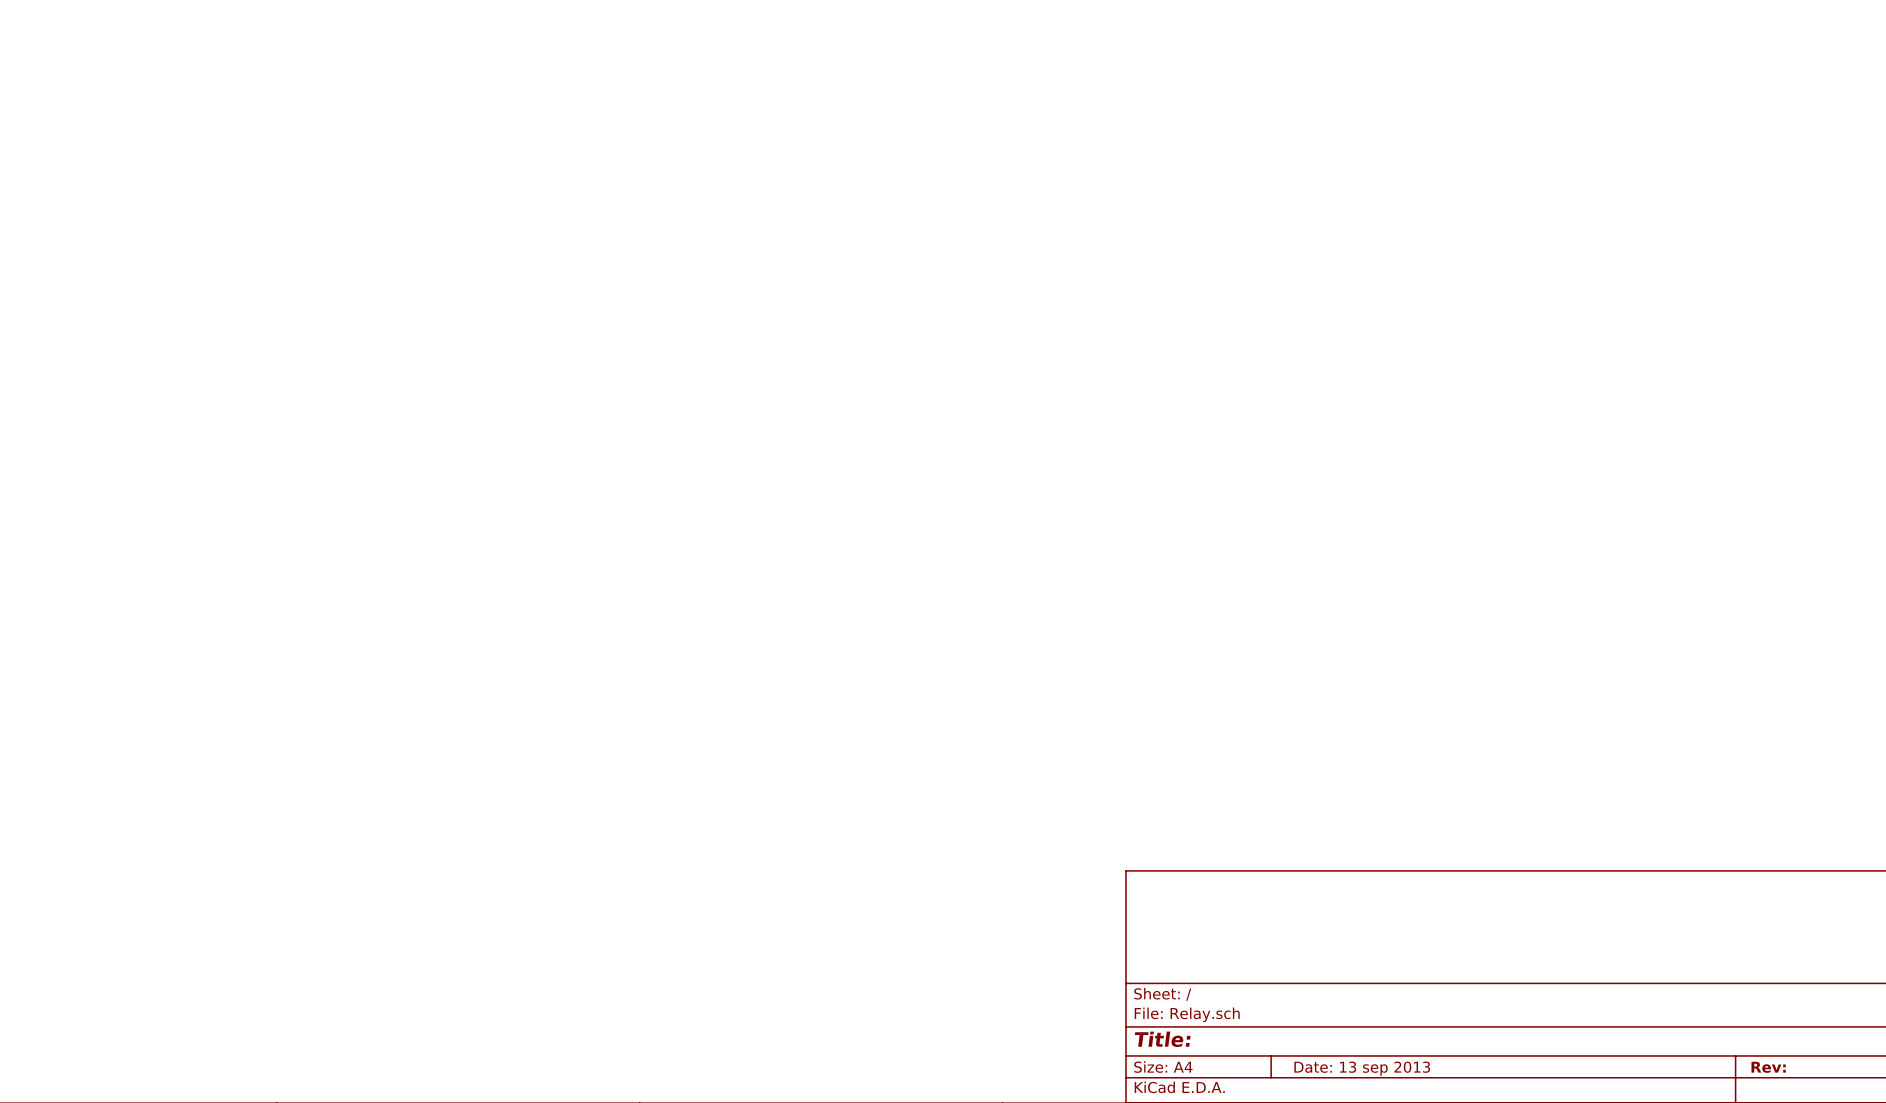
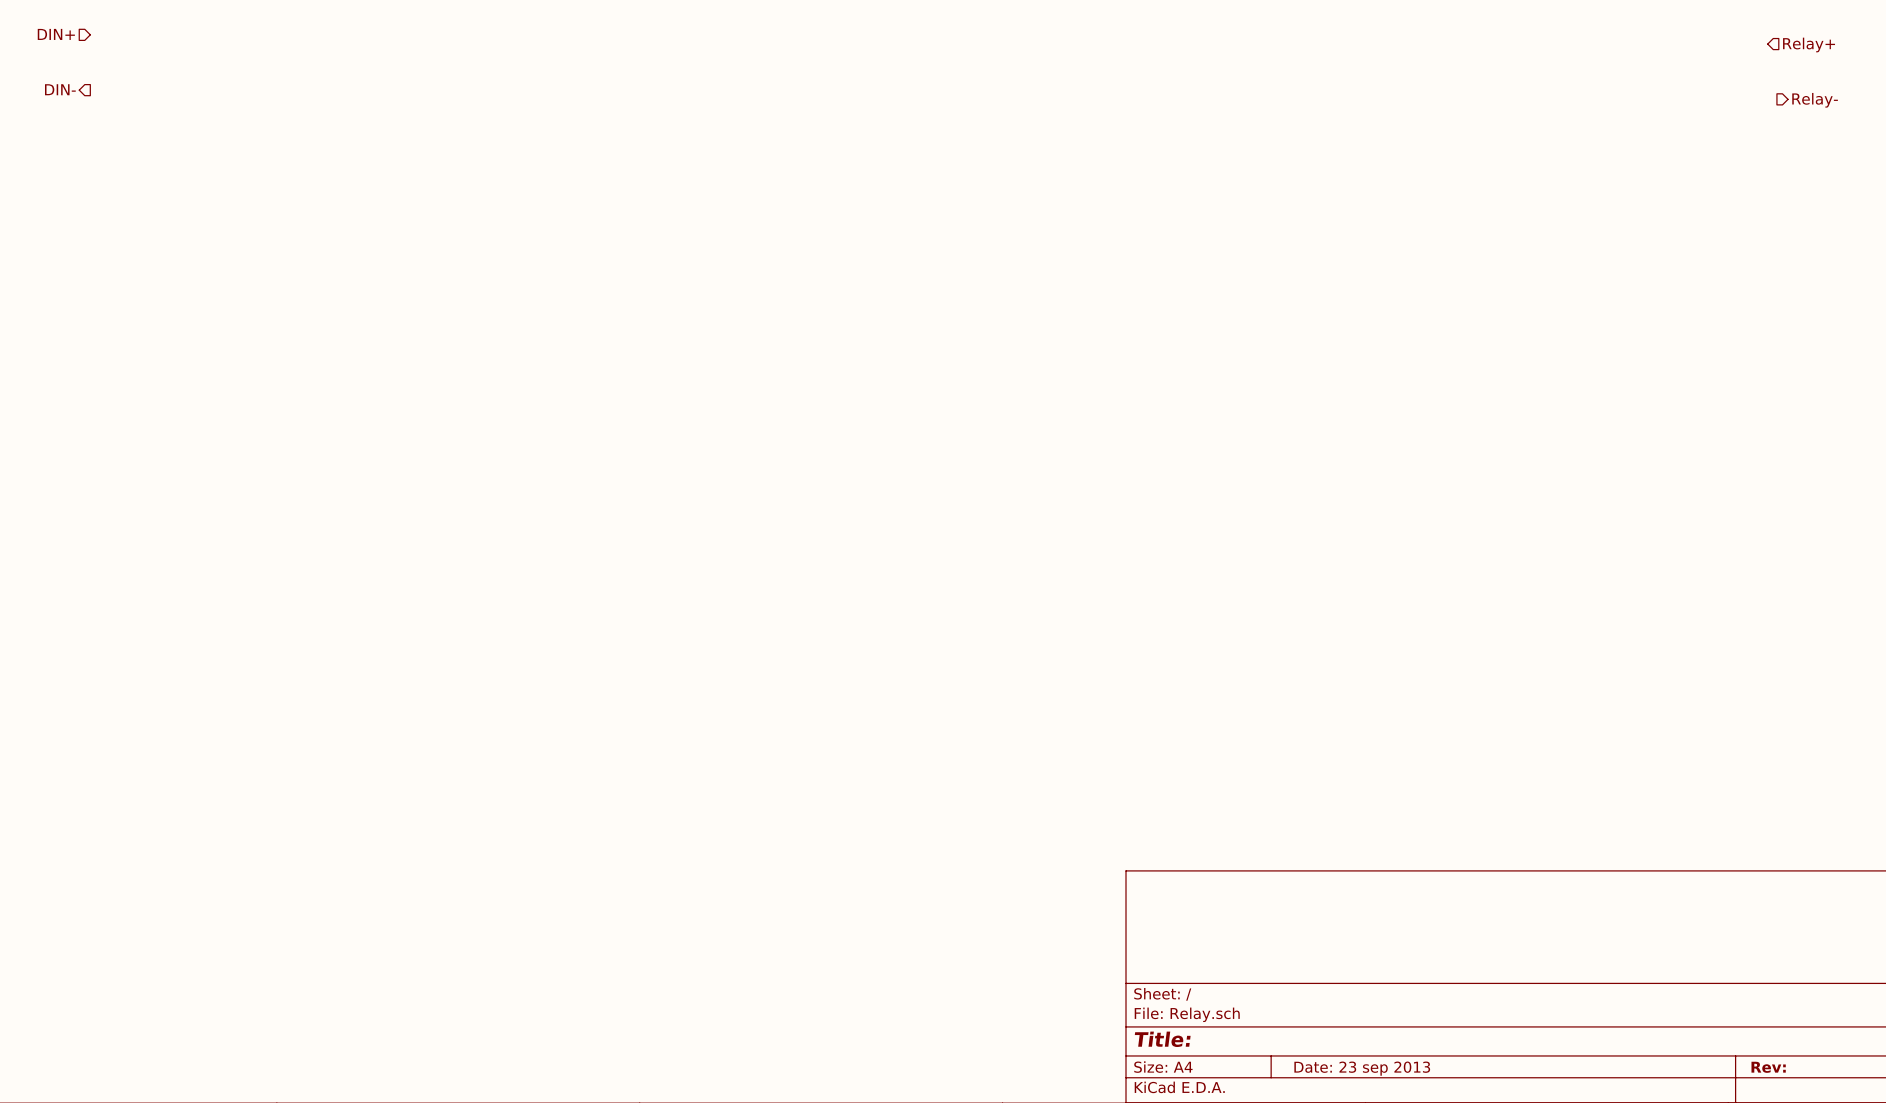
hierarchical label: none -> DIN+ (56, 34)
hierarchical label: none -> Relay+ (1809, 44)
hierarchical label: none -> DIN- (60, 89)
hierarchical label: none -> Relay- (1815, 100)
title block: Date: 13 sep 2013 (1362, 1068) -> Date: 23 sep 2013 (1362, 1068)

